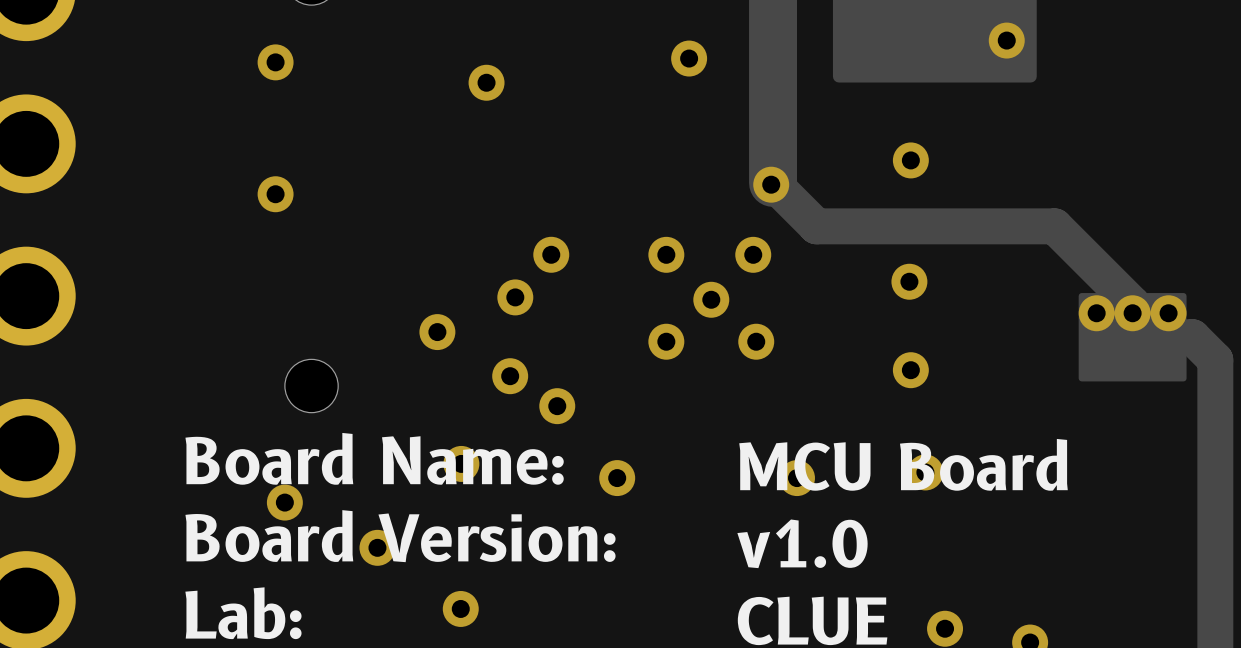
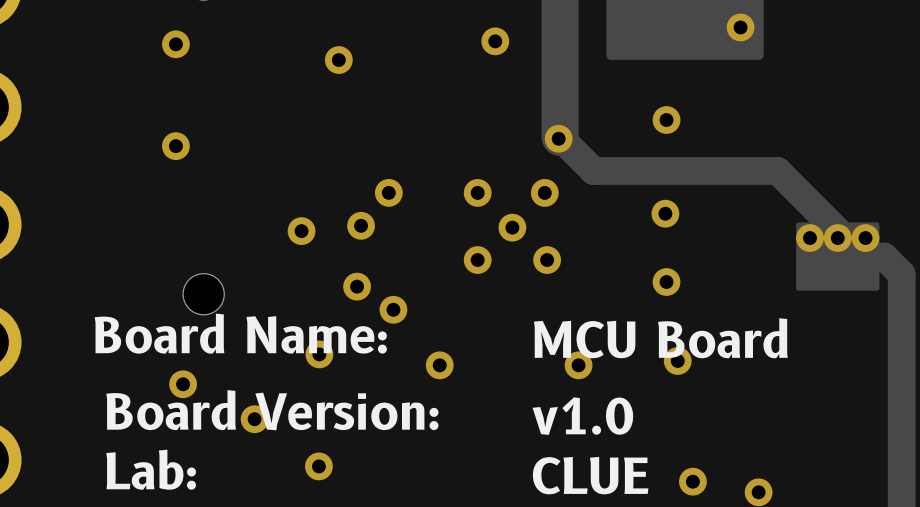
via position: (437, 332) -> (301, 231)
text position: Board Name: (374, 458) -> Board Name: (240, 333)
text position: MCU Board (903, 464) -> MCU Board (660, 338)

